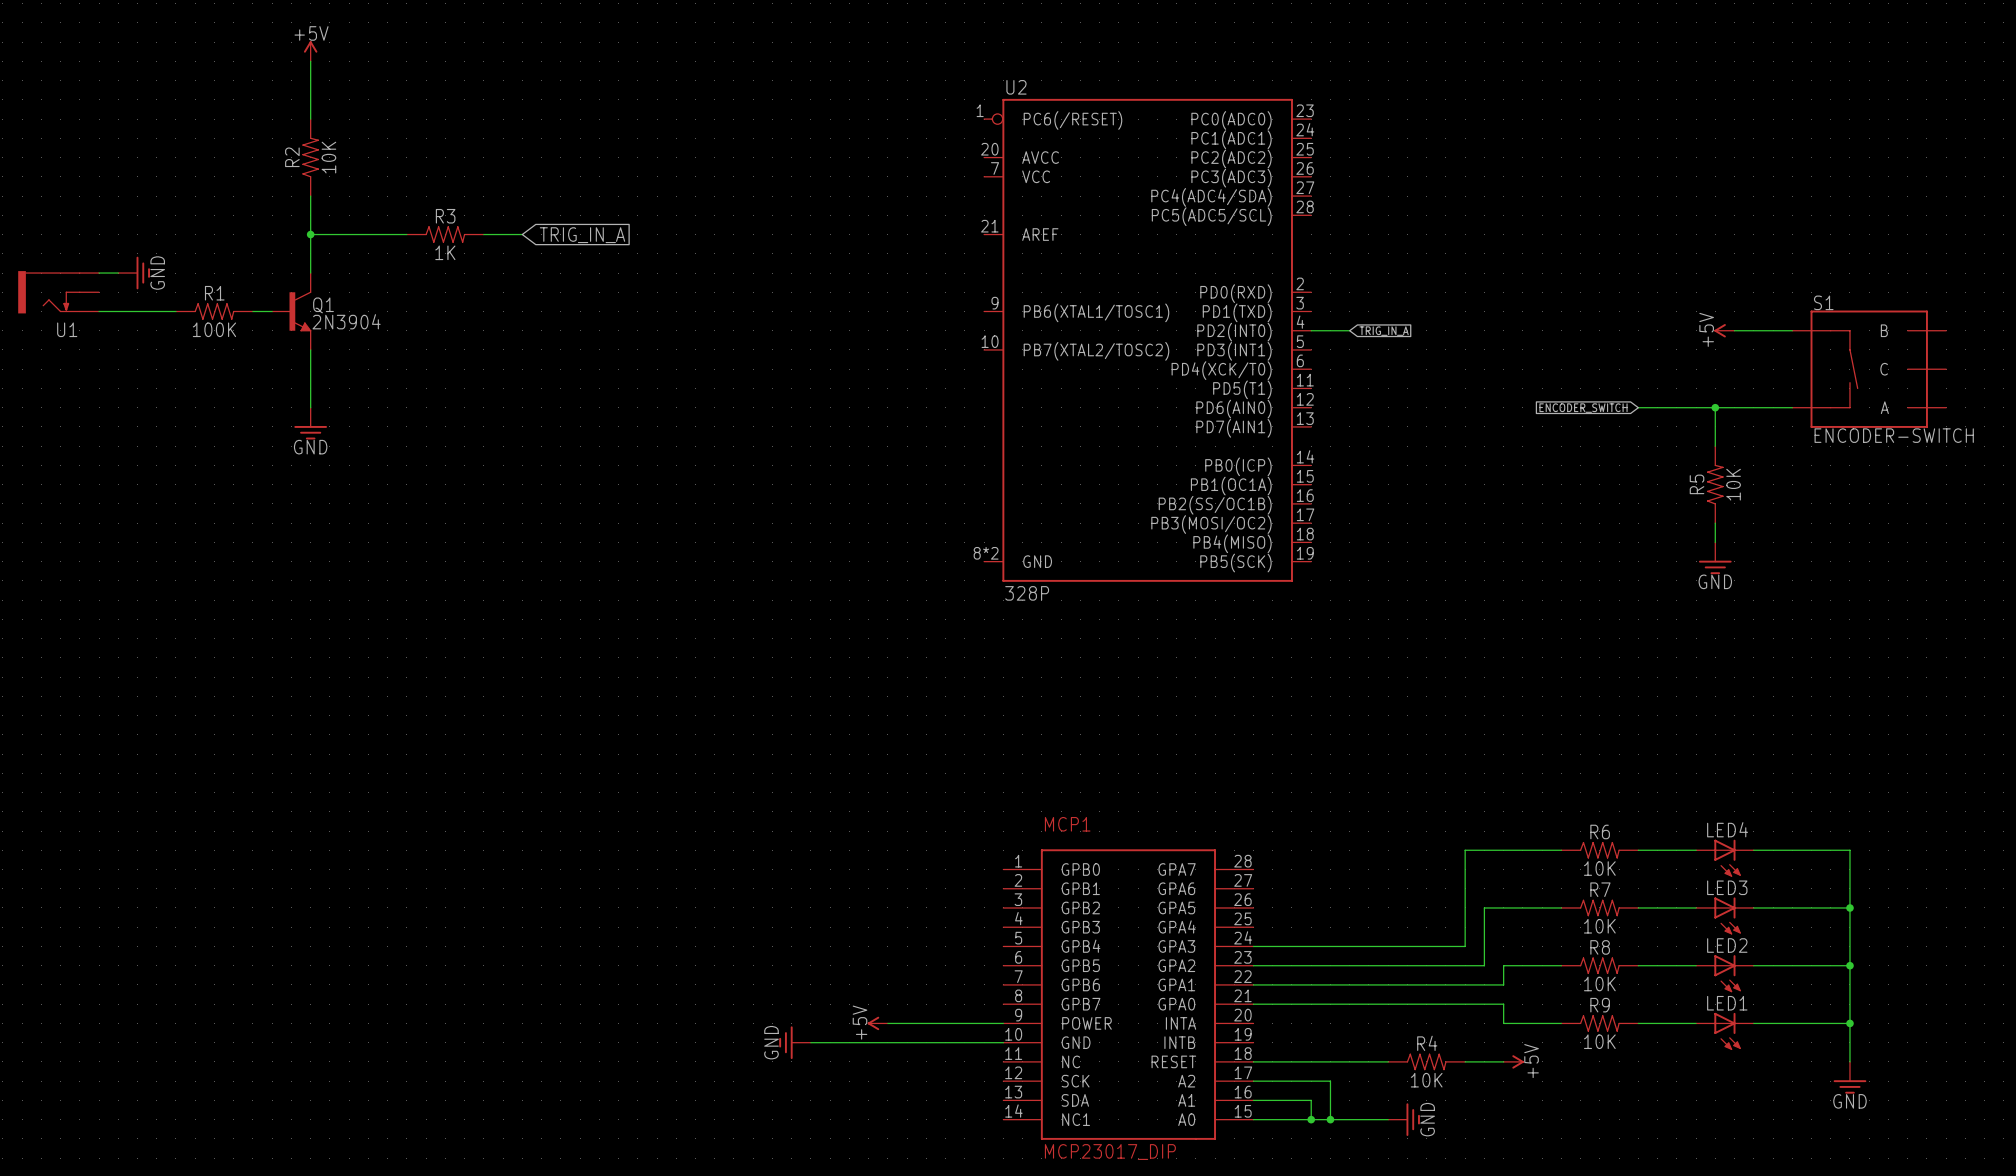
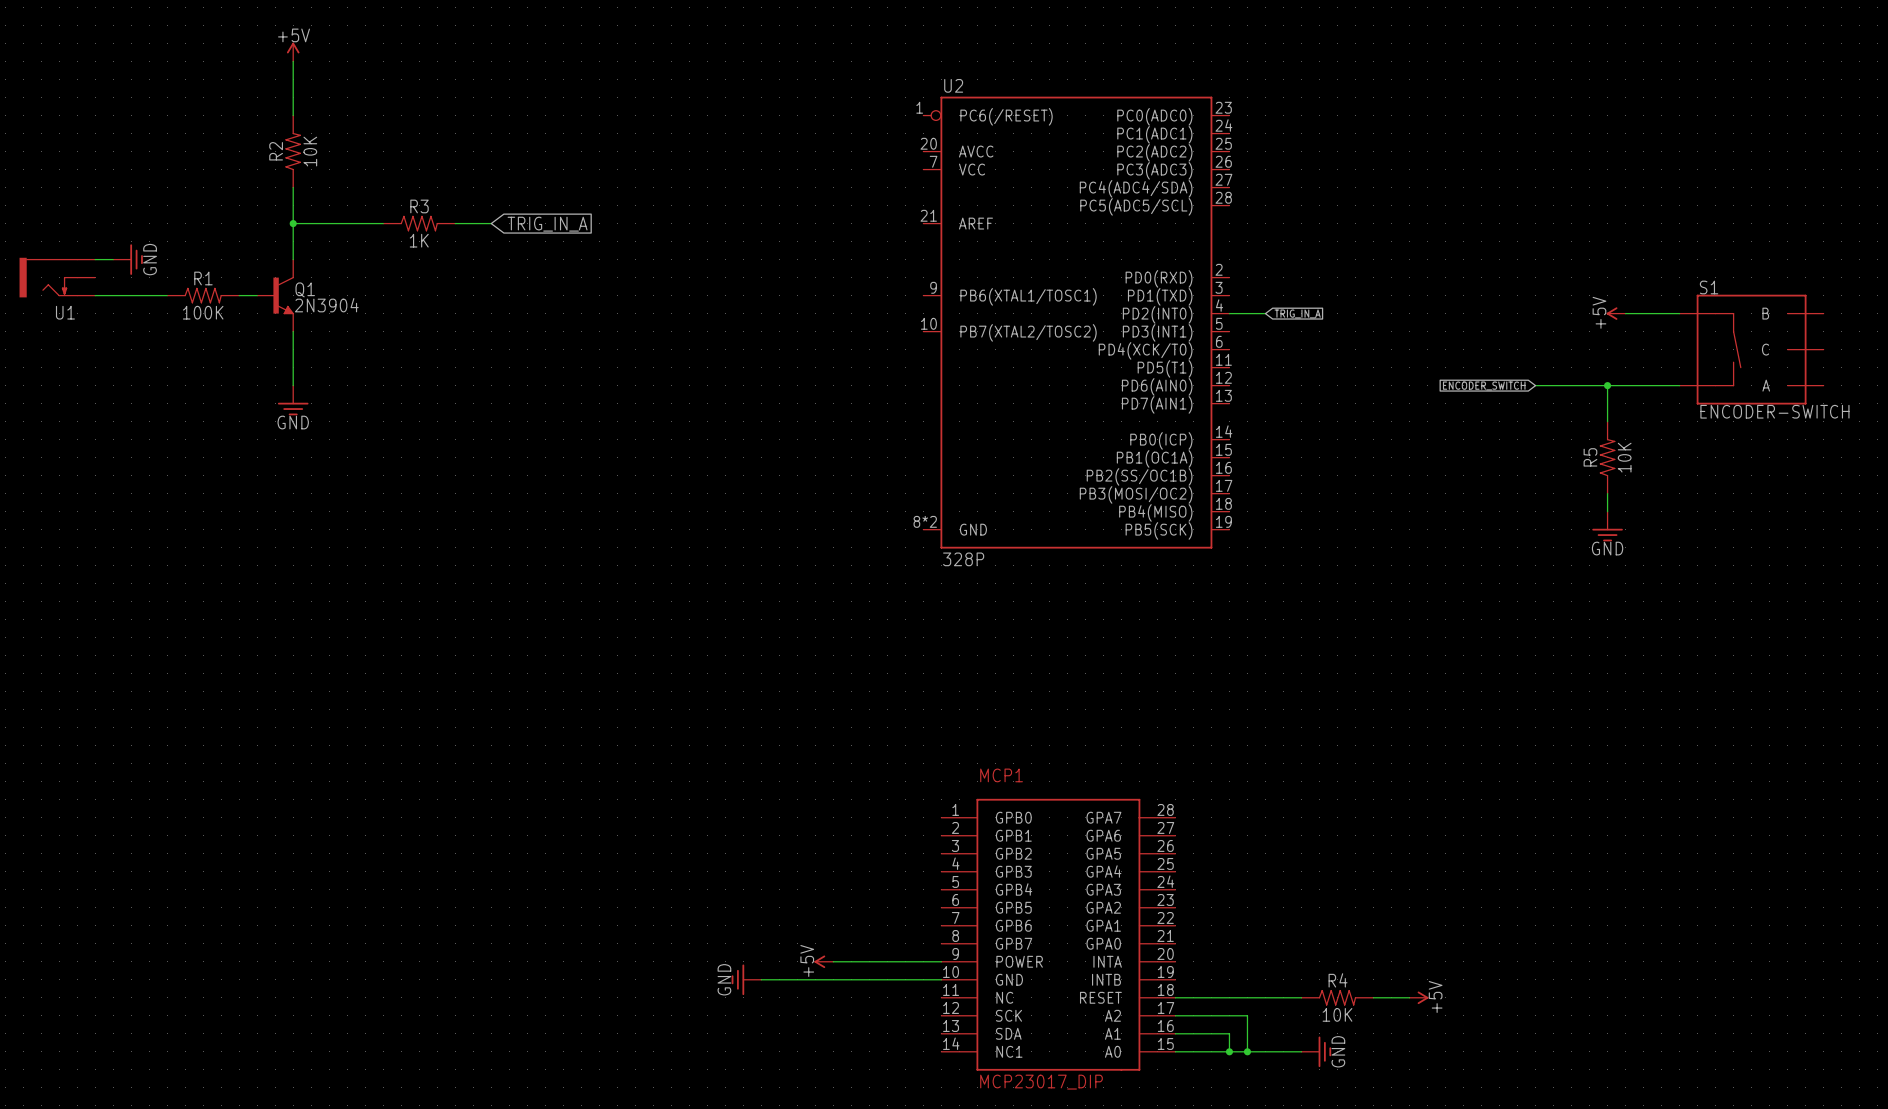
wire: (1561, 850) (1465, 850) (1465, 946) (1253, 946) -> none
R6: 10K (1599, 850) -> none
wire: (1638, 850) (1696, 850) -> none
wire: (1753, 850) (1849, 850) (1849, 1061) -> none
LED4: (1724, 858) -> none
wire: (1561, 907) (1484, 907) (1484, 965) (1253, 965) -> none
R7: 10K (1599, 907) -> none
wire: (1638, 907) (1696, 907) -> none
wire: (1753, 907) (1849, 907) -> none
junction: (1849, 907) -> none
LED3: (1724, 915) -> none
wire: (1561, 965) (1503, 965) (1503, 984) (1253, 984) -> none
R8: 10K (1599, 965) -> none
wire: (1638, 965) (1696, 965) -> none
wire: (1753, 965) (1849, 965) -> none
junction: (1849, 965) -> none
LED2: (1724, 973) -> none
wire: (1253, 1004) (1503, 1004) (1503, 1023) (1561, 1023) -> none
R9: 10K (1599, 1023) -> none
wire: (1638, 1023) (1696, 1023) -> none
wire: (1753, 1023) (1849, 1023) -> none
junction: (1849, 1023) -> none
LED1: (1724, 1031) -> none
power symbol: GND (1849, 1077) -> none

